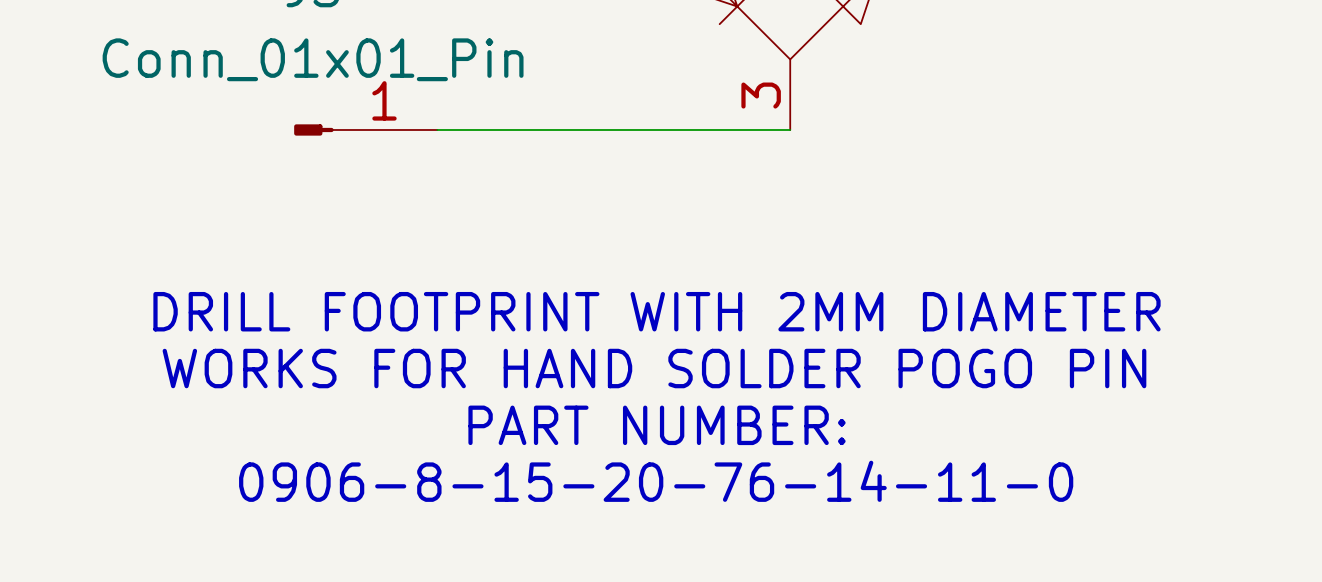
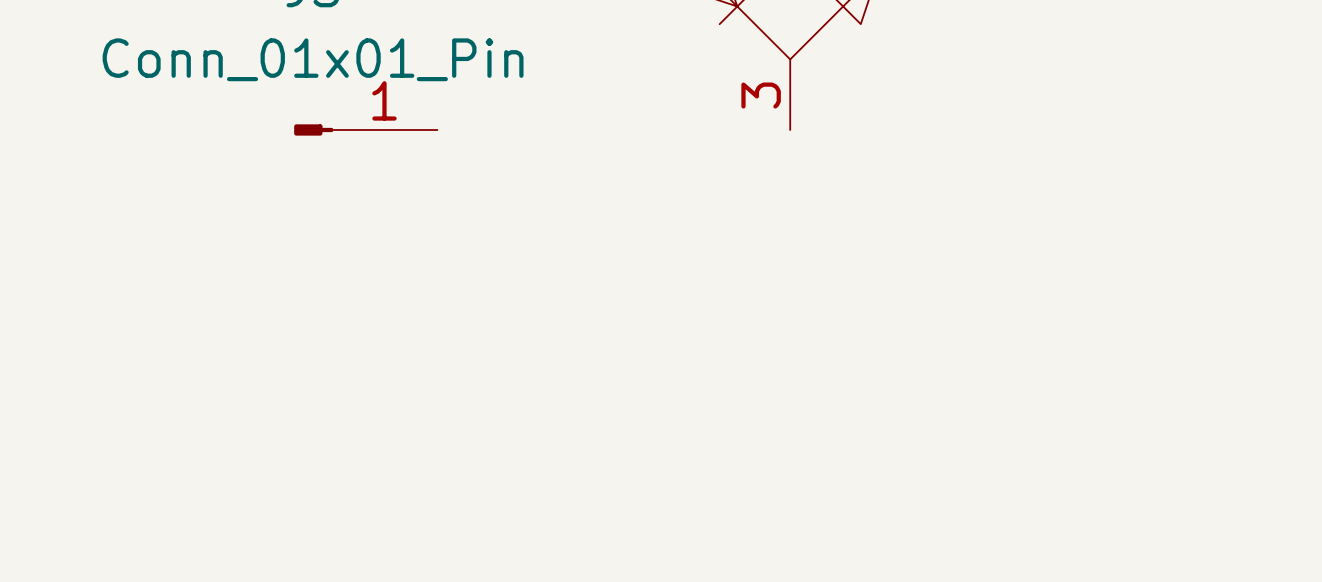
wire: (437, 129) (790, 129) -> none
text: DRILL FOOTPRINT WITH 2MM DIAMETER (656, 311) -> none
text: WORKS FOR HAND SOLDER POGO PIN (654, 368) -> none
text: PART NUMBER: (656, 425) -> none
text: 0906-8-15-20-76-14-11-0 (656, 481) -> none

